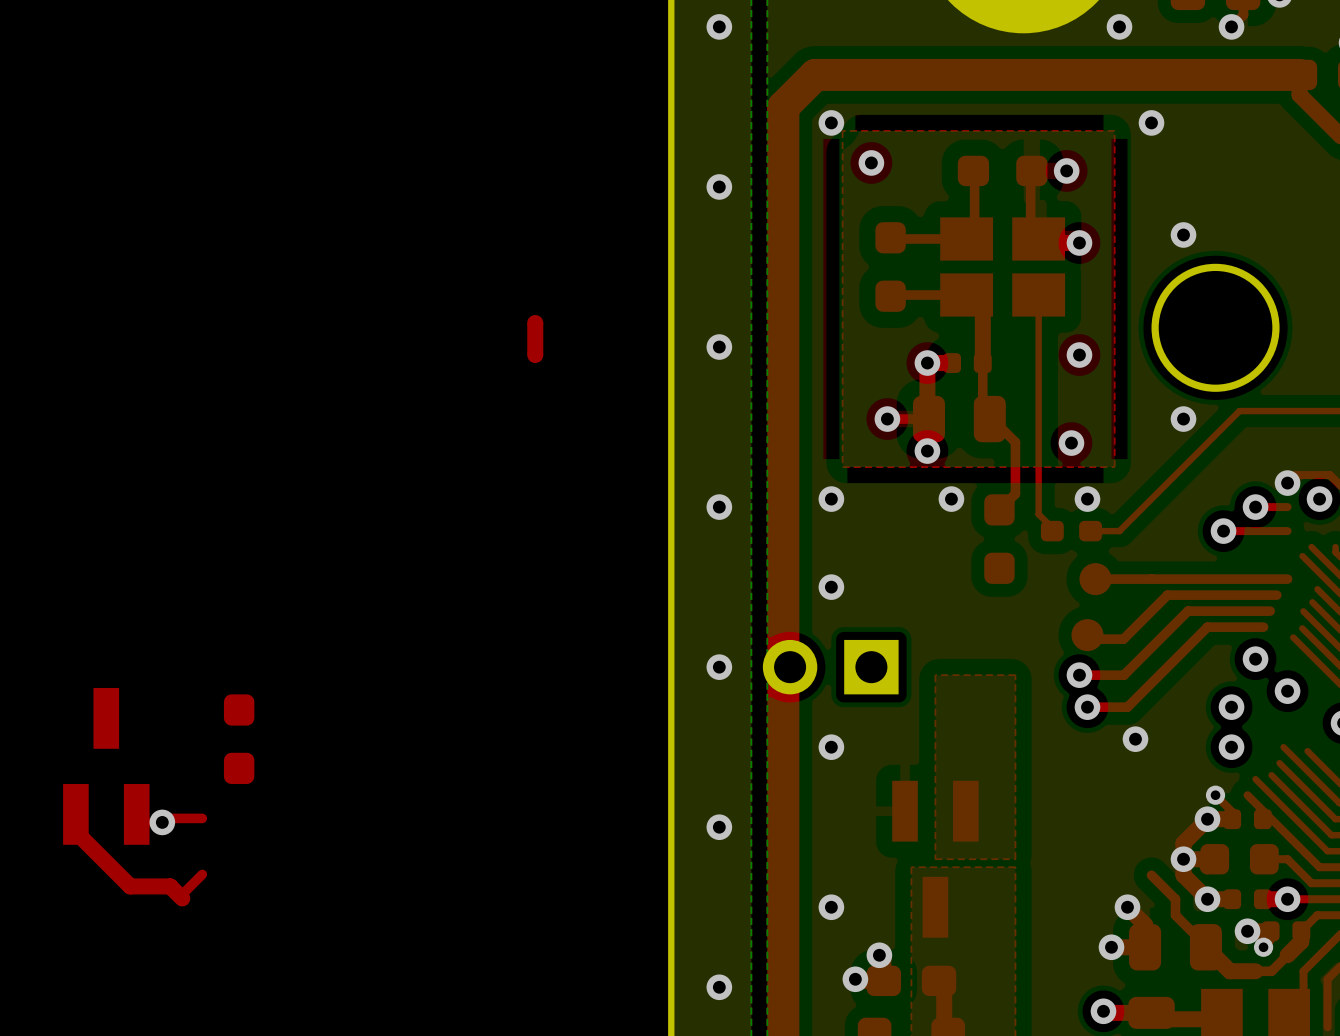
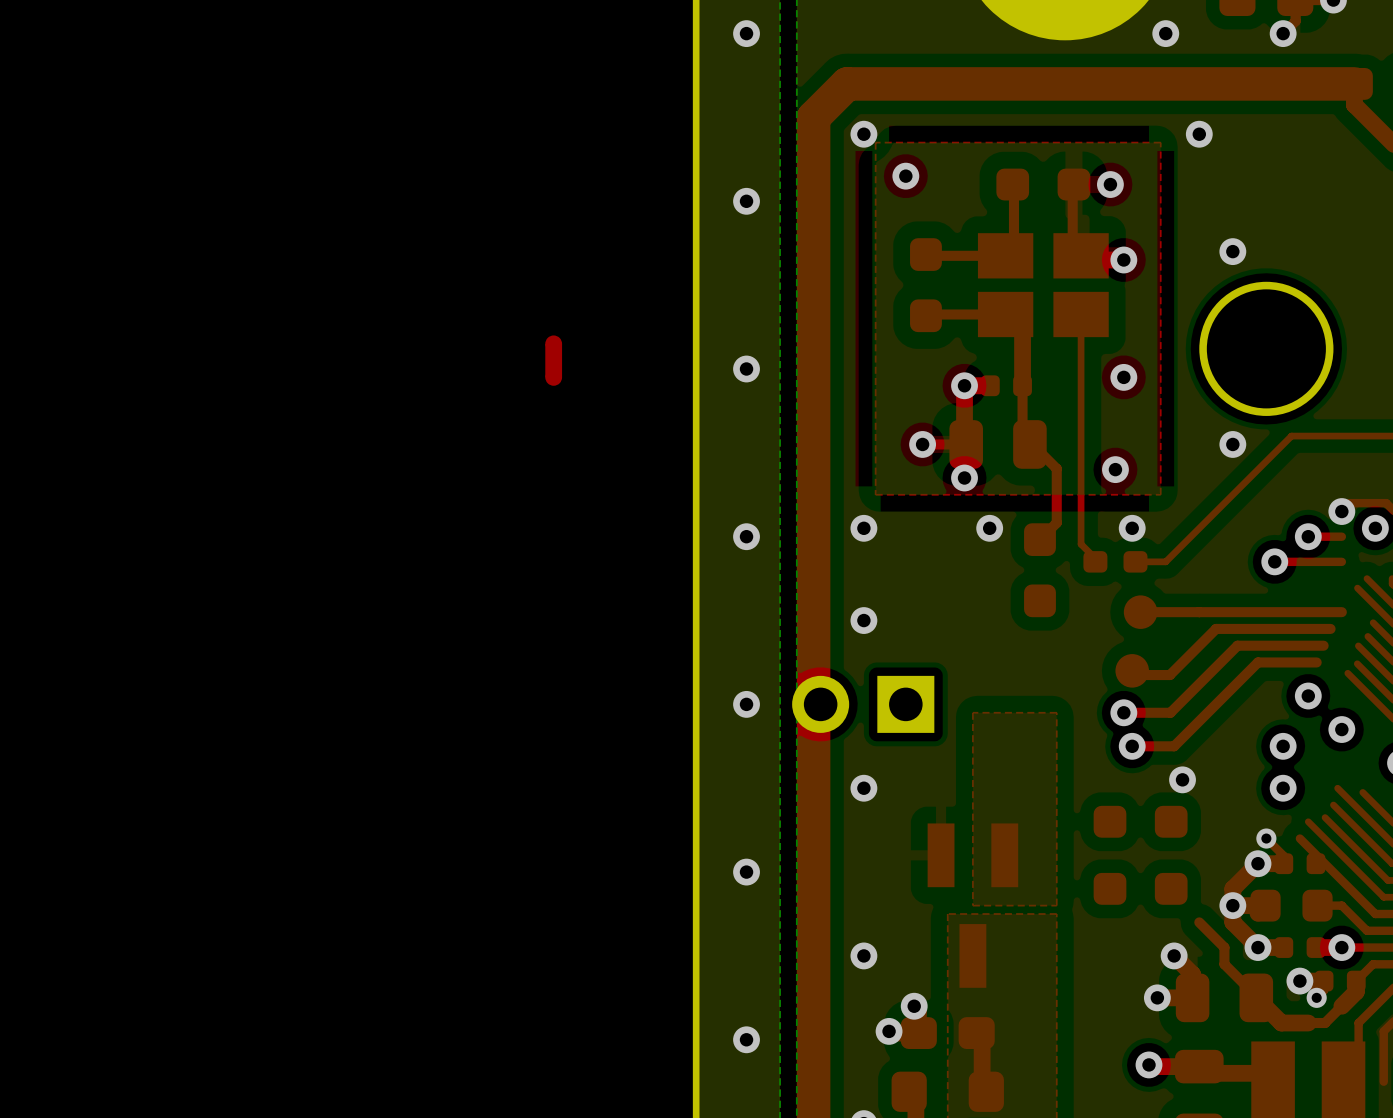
part: (239, 739) -> none
part: (106, 766) -> none
part: none -> (1140, 821)
top track: (75, 814) (75, 832) (130, 886) (170, 886) (182, 898) (182, 894) (202, 874) -> none
top track: (136, 814) (144, 822) (162, 822) (166, 818) (202, 818) -> none
via: (162, 822) -> none
part: none -> (1140, 888)

